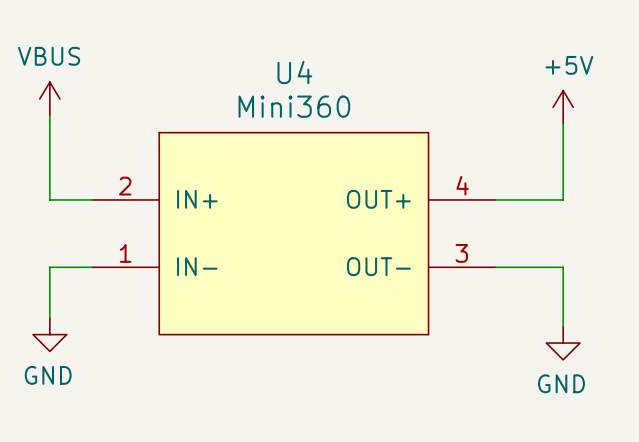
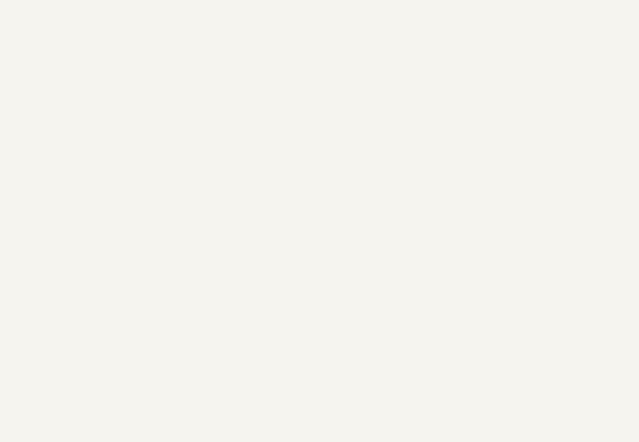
power symbol: VBUS (49, 98) -> none
power symbol: +5V (563, 107) -> none
wire: (49, 115) (49, 199) (91, 199) -> none
wire: (563, 124) (563, 199) (495, 199) -> none
U4: Mini360 (293, 233) -> none
wire: (91, 267) (49, 267) (49, 317) -> none
wire: (495, 267) (563, 267) (563, 326) -> none
power symbol: GND (49, 334) -> none
power symbol: GND (563, 343) -> none

